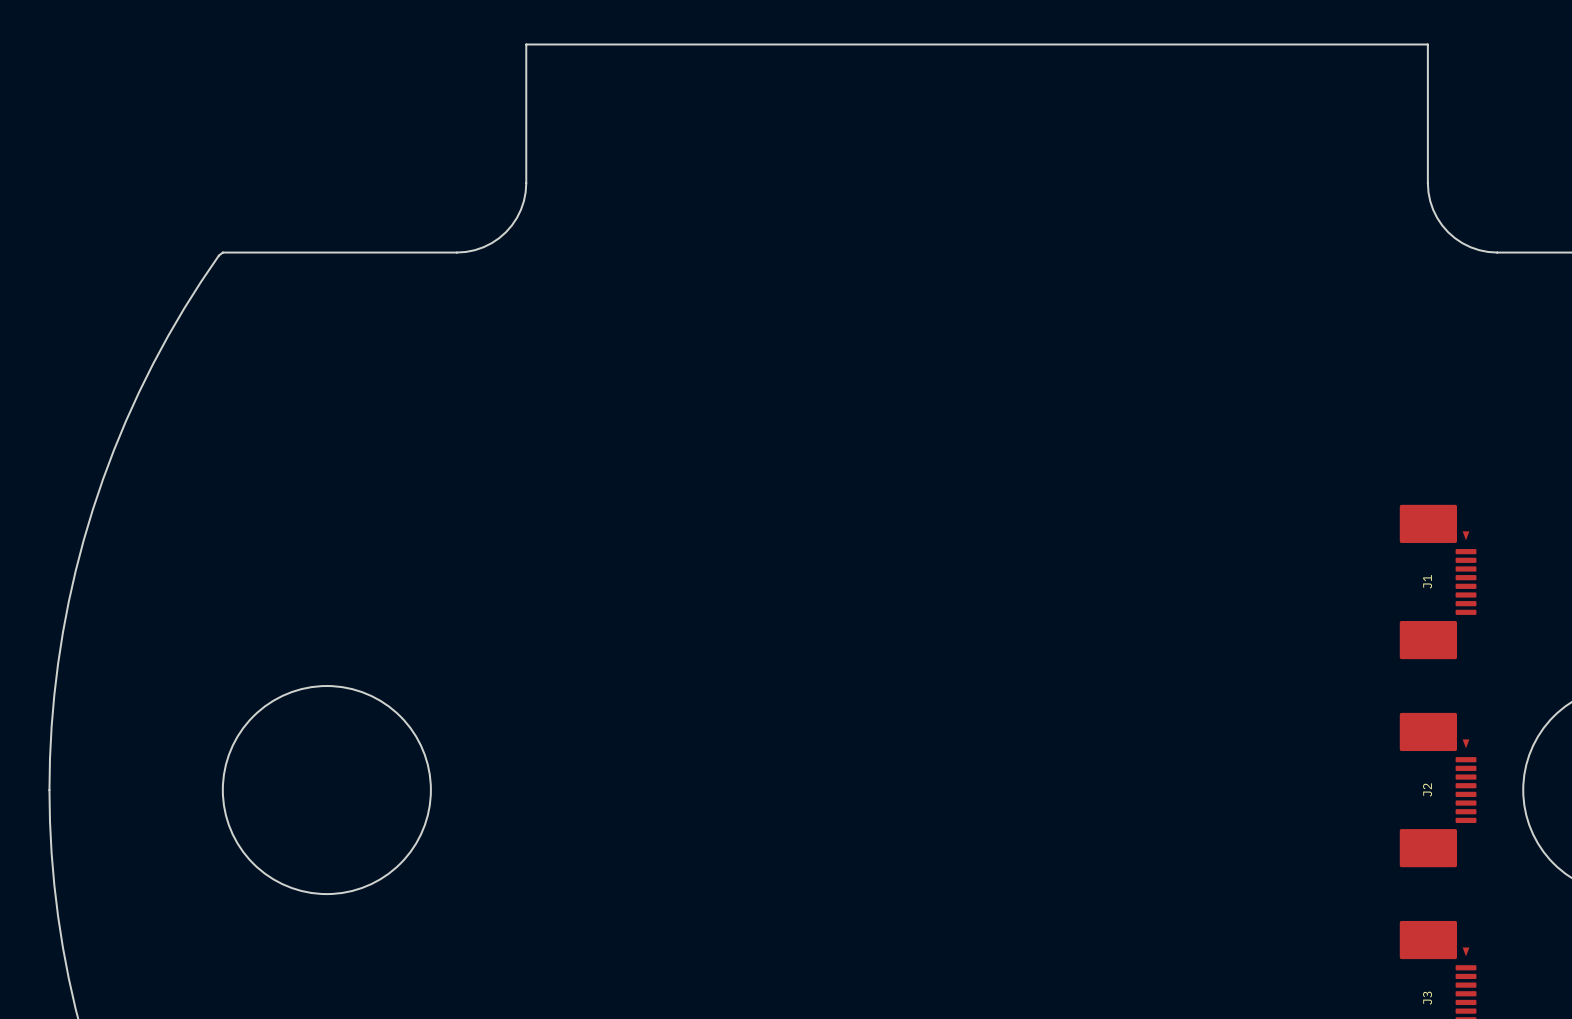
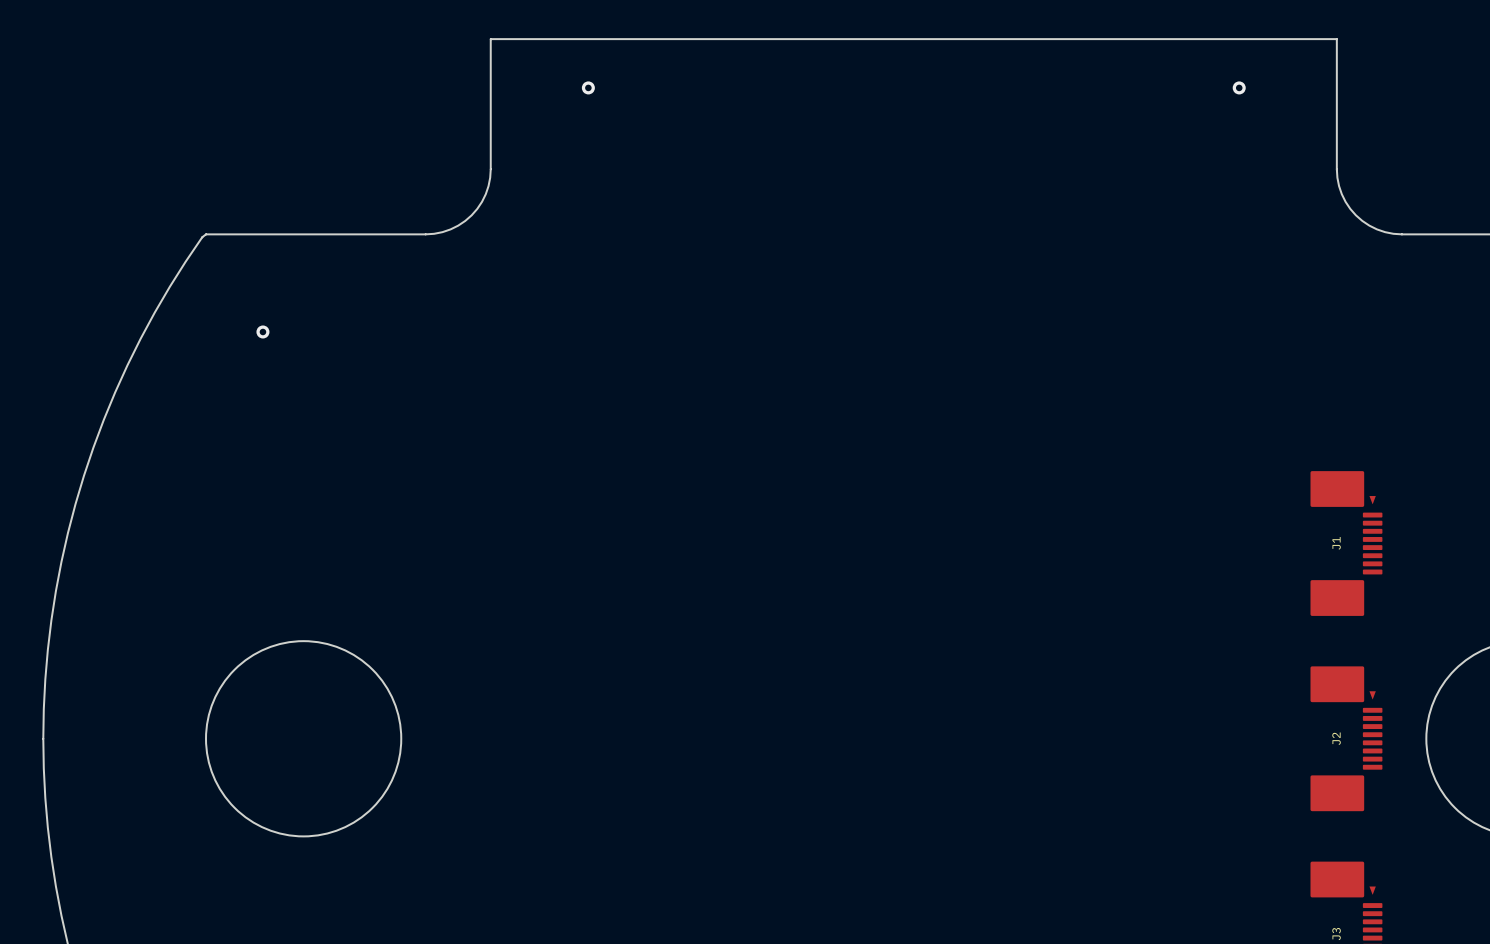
via: none -> (588, 87)
via: none -> (1239, 87)
via: none -> (262, 331)

